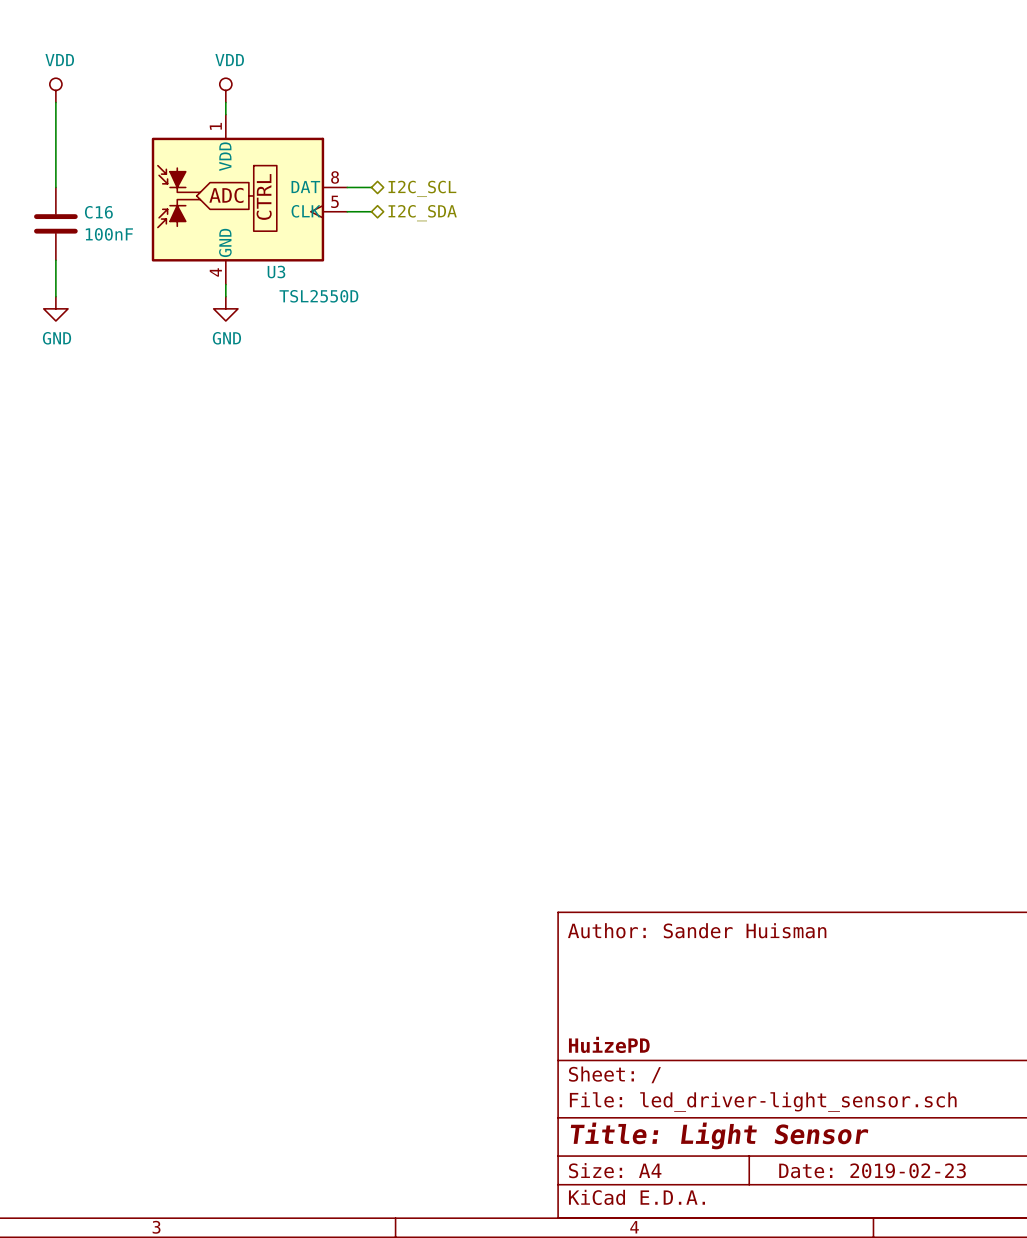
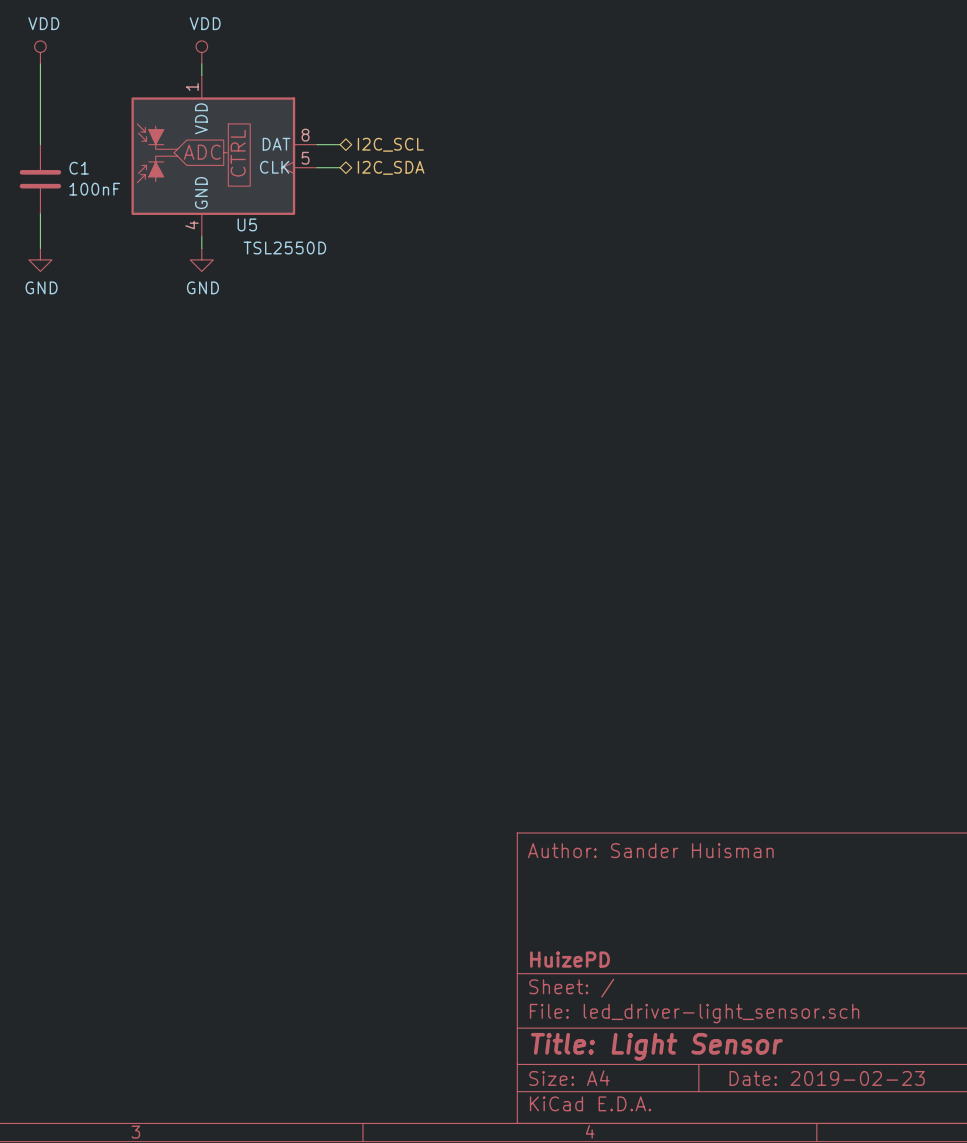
C16 name: C16 (98, 212) -> C1 (79, 168)
U3 name: U3 (276, 272) -> U5 (247, 224)

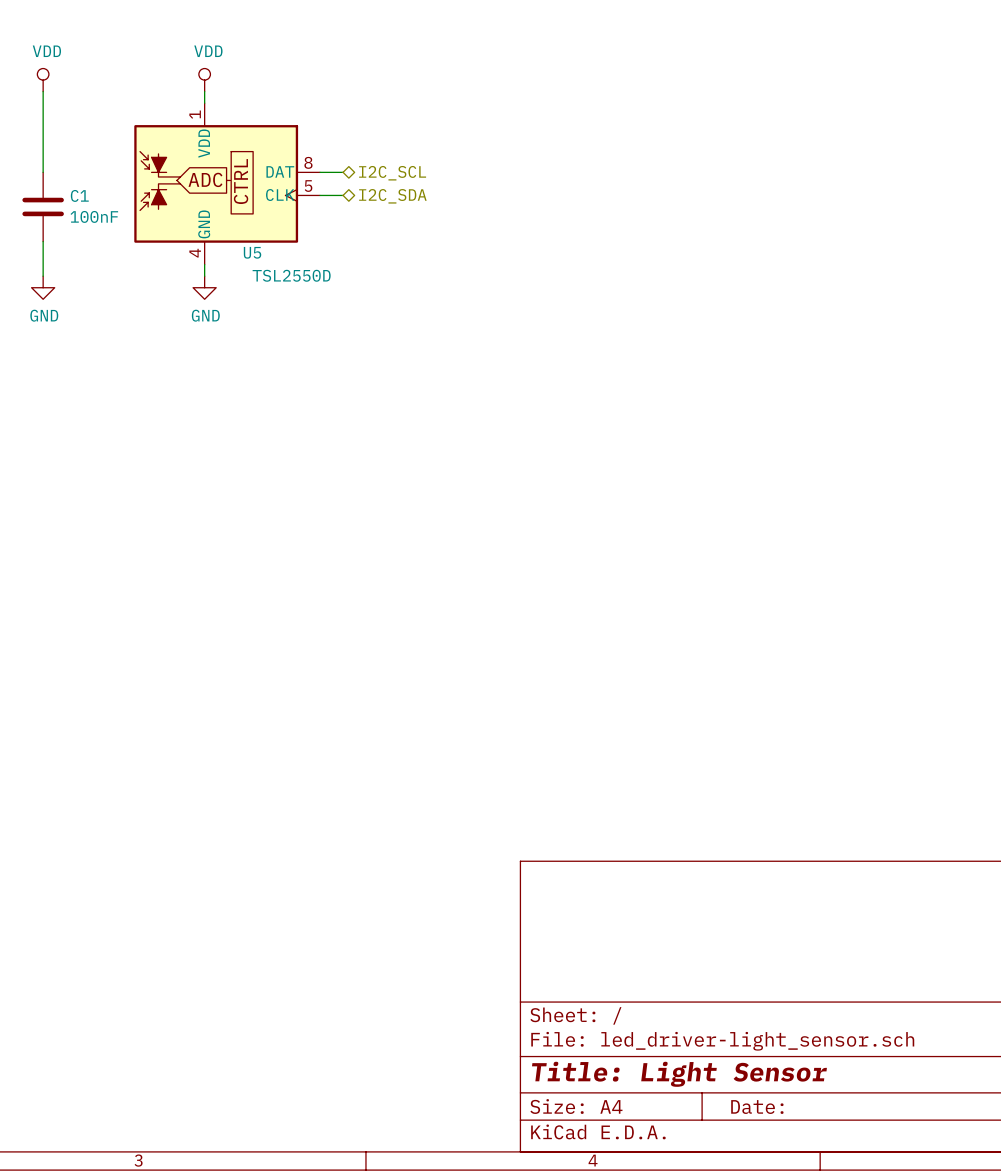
title block: Author: Sander Huisman (650, 850) -> none
title block: HuizePD (570, 959) -> none
title block: Date: 2019-02-23 (827, 1078) -> Date: (757, 1107)

